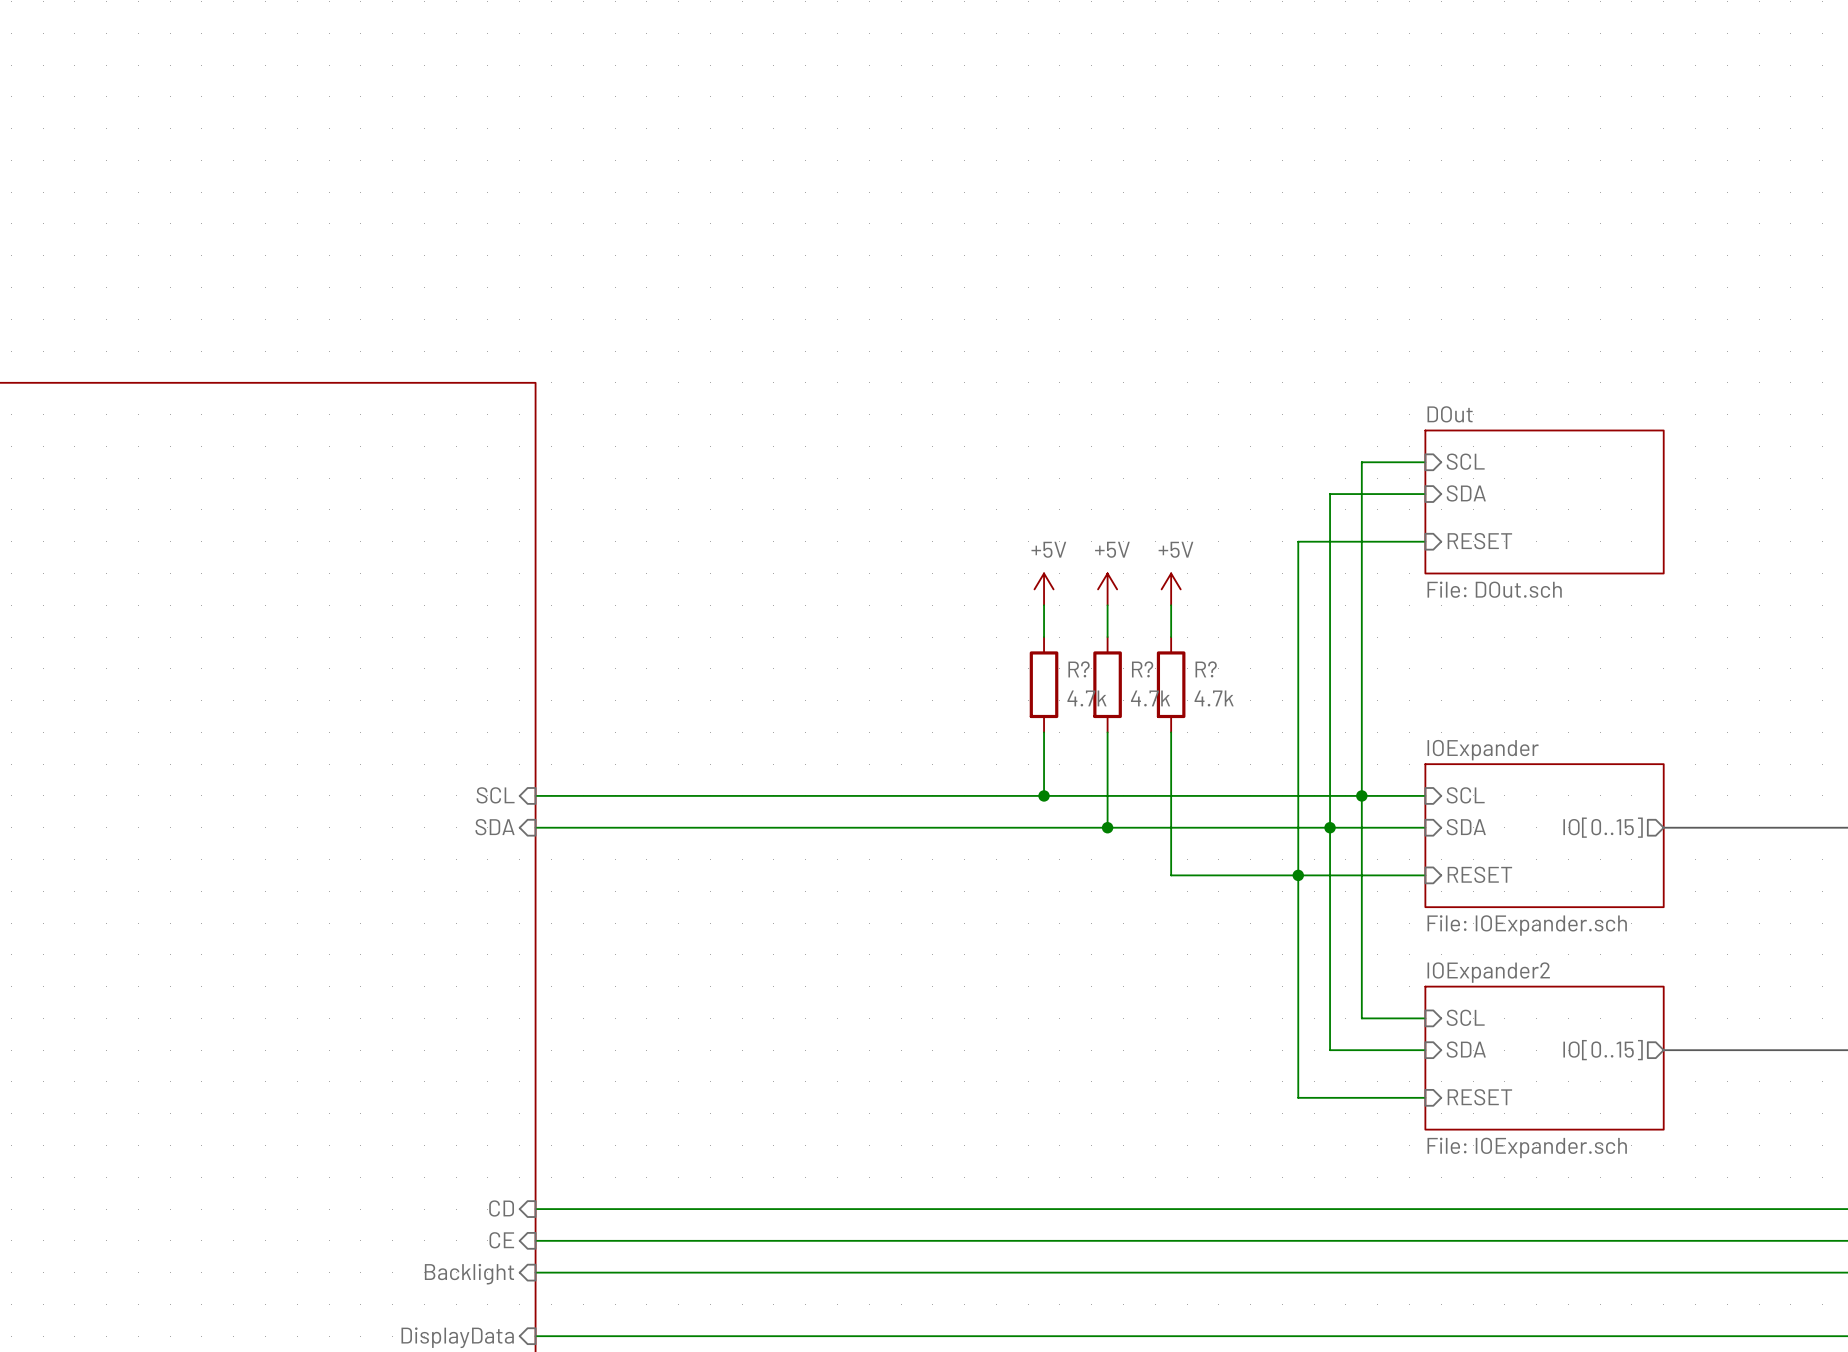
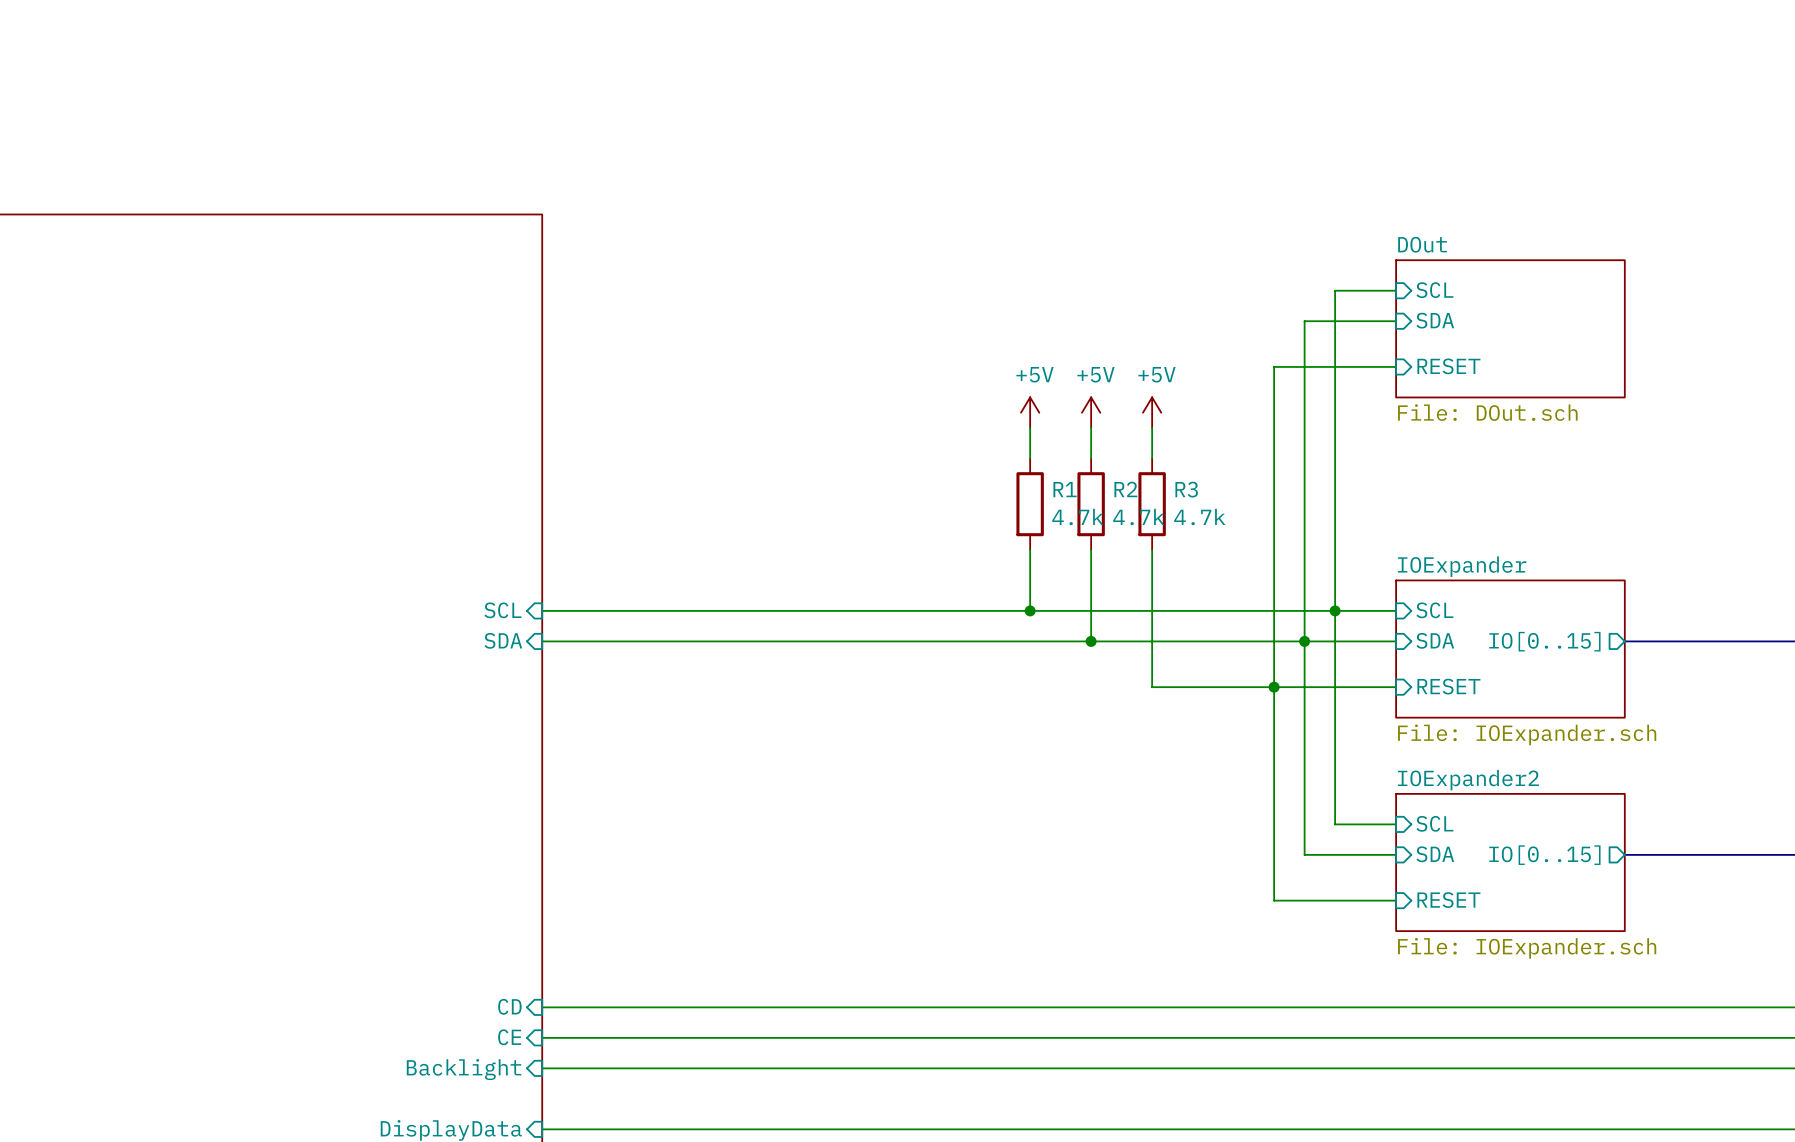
R? name: R? (1079, 669) -> R1 (1065, 489)
R? name: R? (1142, 669) -> R2 (1125, 489)
R? name: R? (1206, 669) -> R3 (1186, 489)

